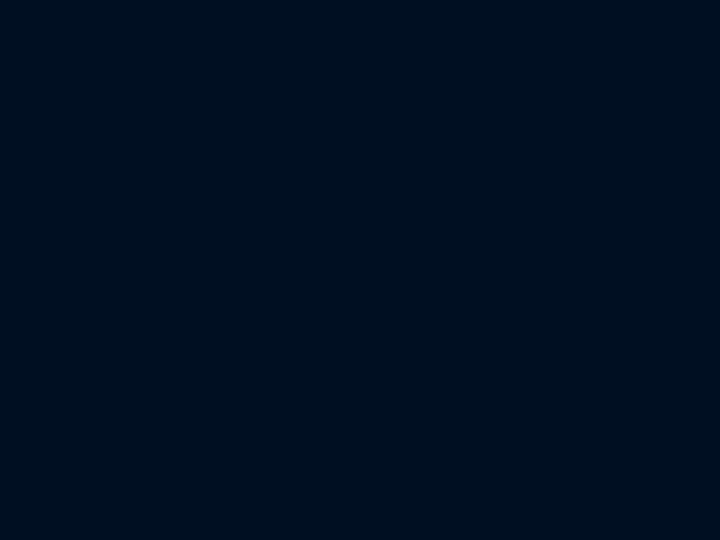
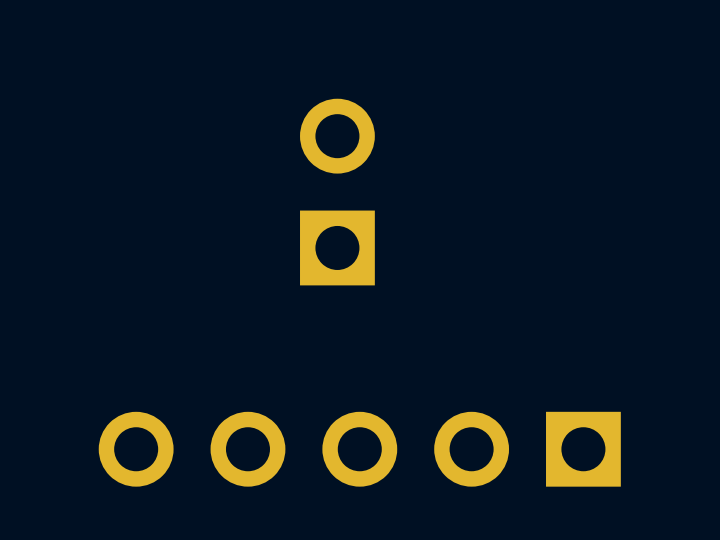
part: none -> (337, 192)
part: none -> (359, 449)

